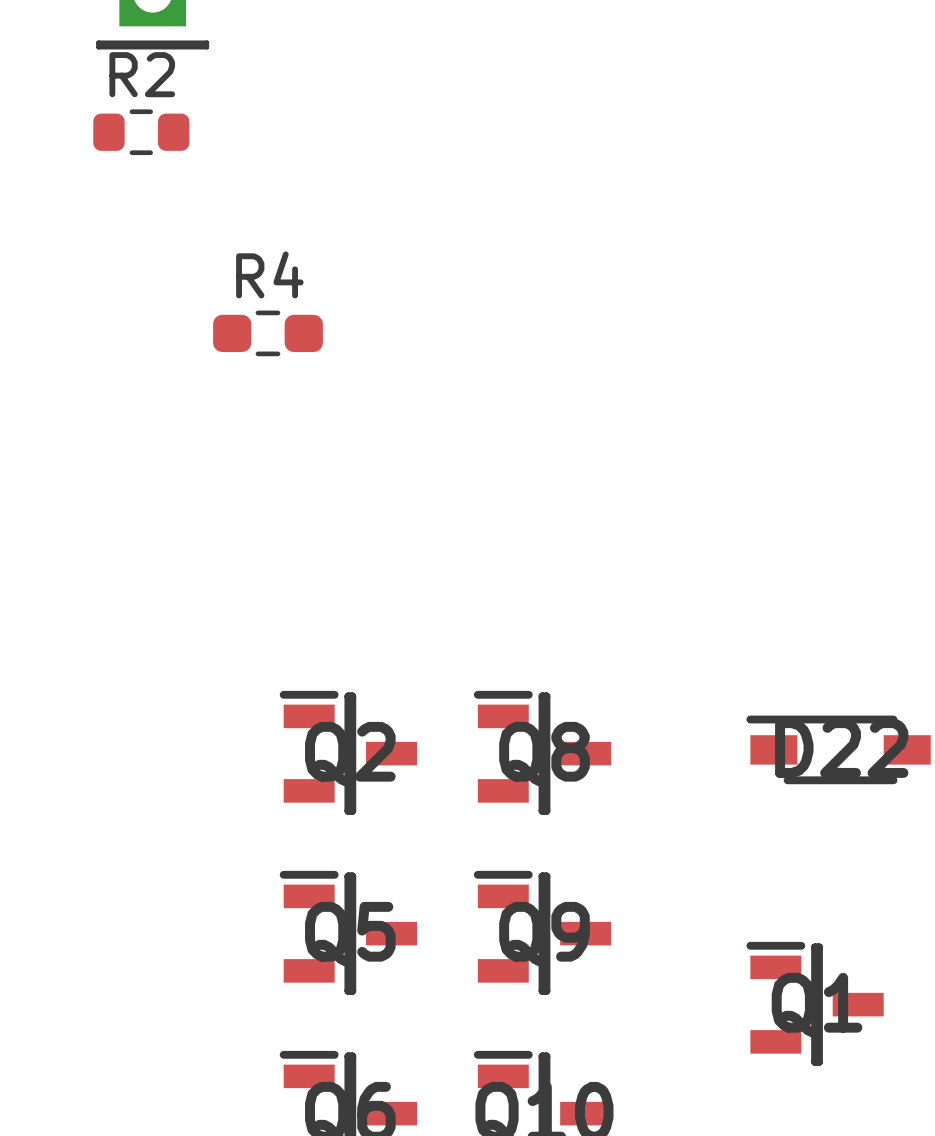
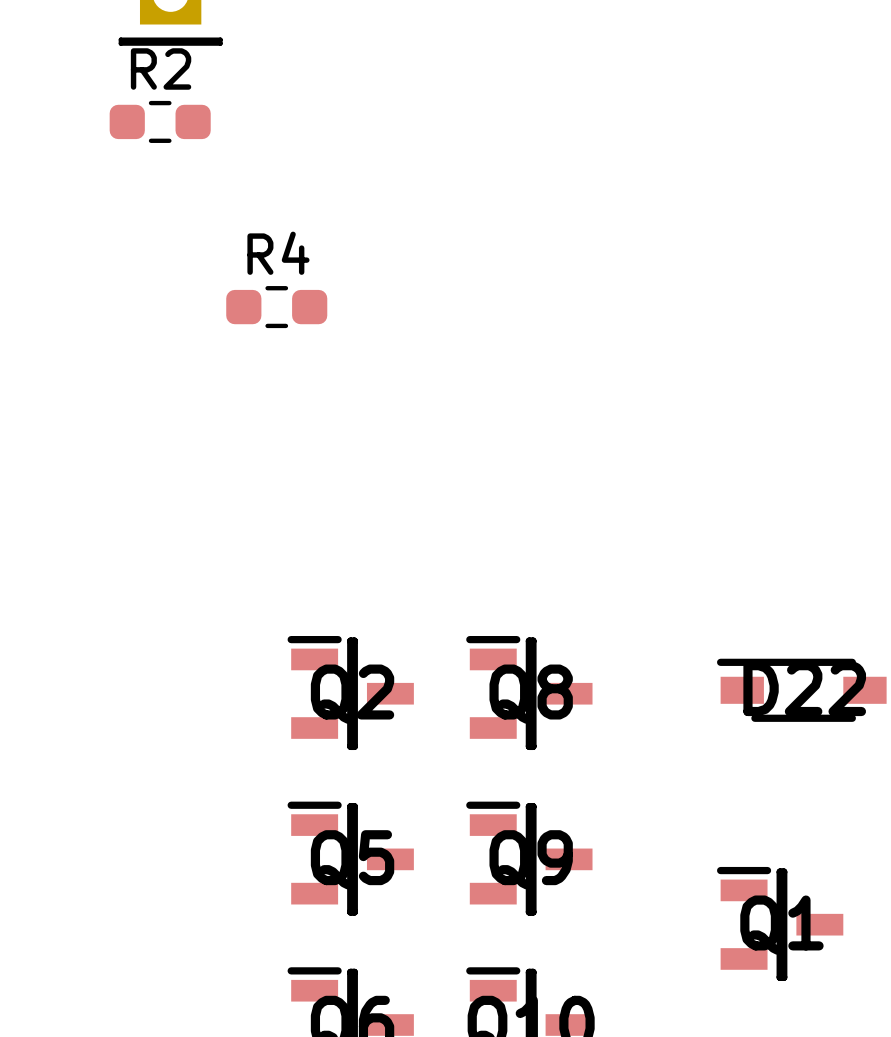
R2 footprint: [93, 109, 190, 156] -> [109, 100, 211, 143]

